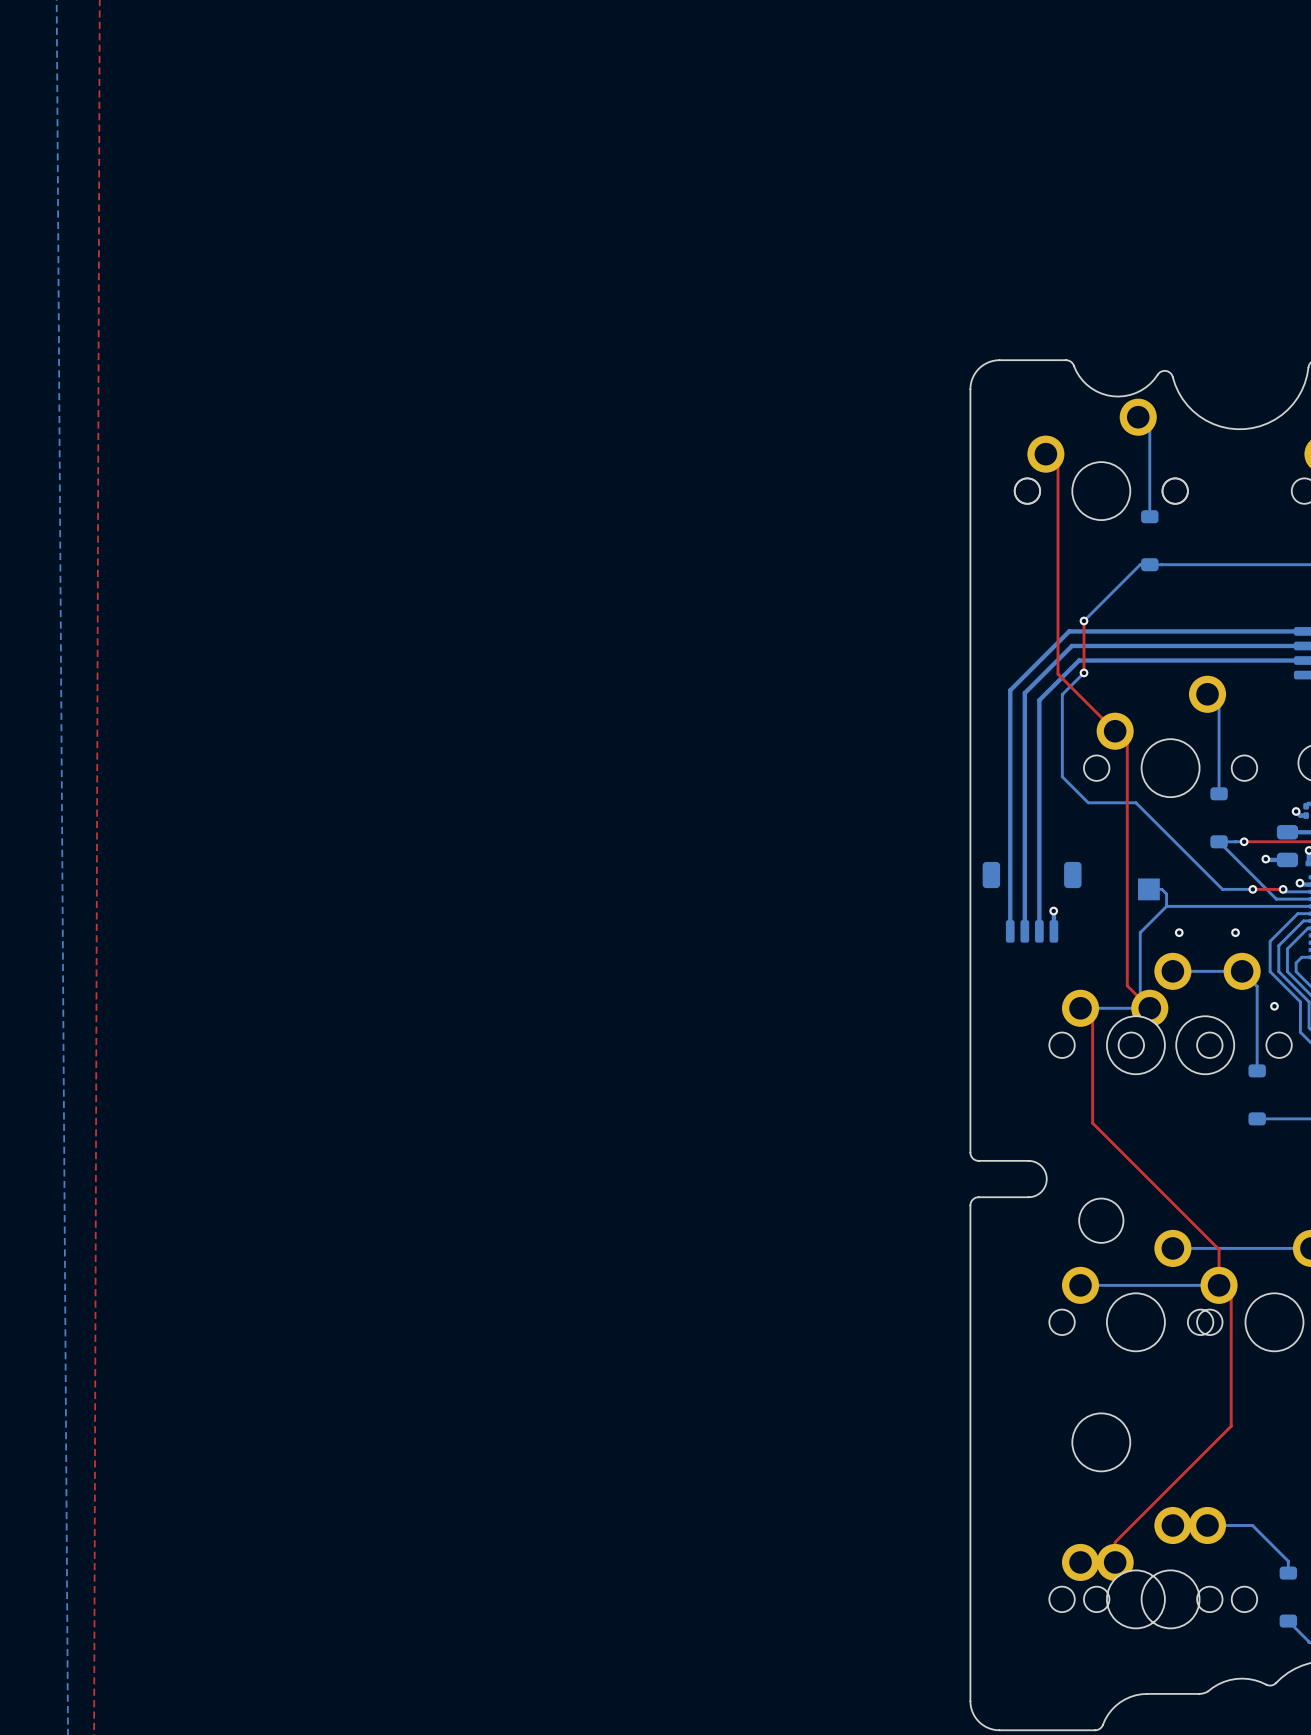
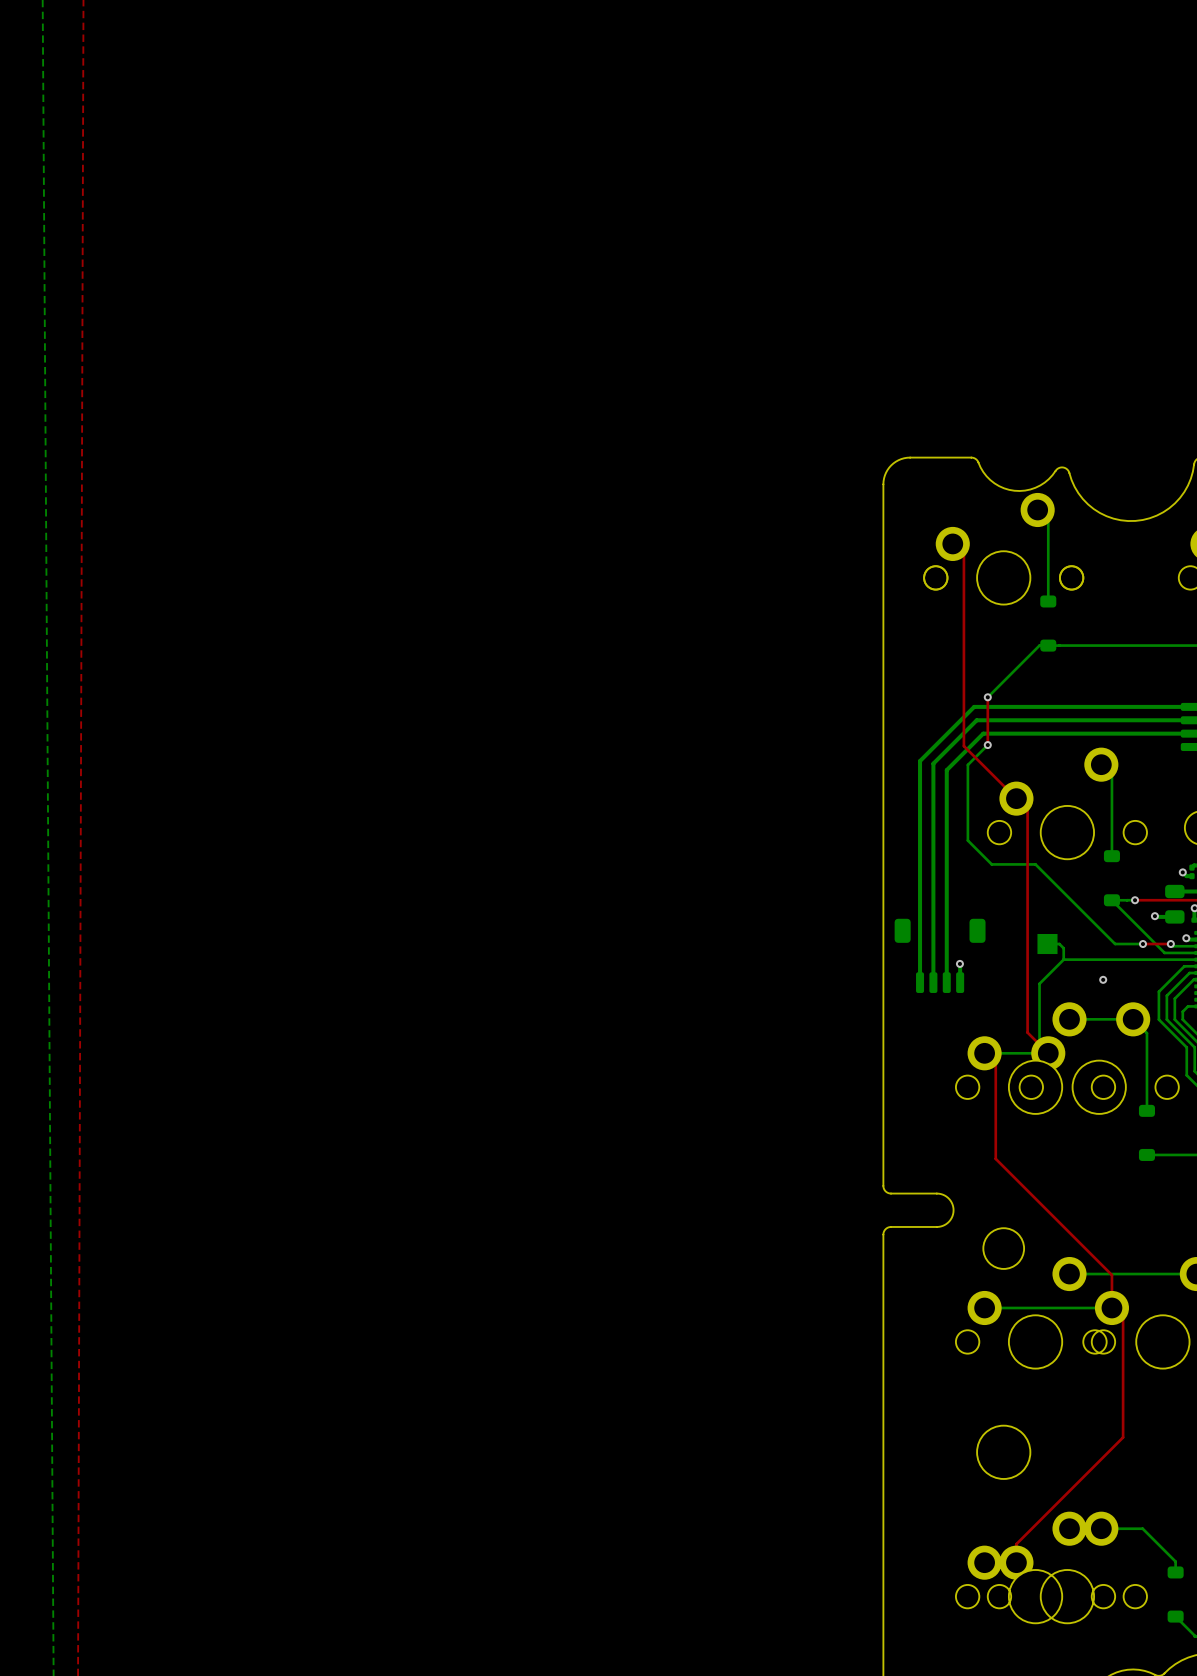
via: none -> (1103, 979)
via: (1179, 932) -> none
via: (1235, 932) -> none
via: (1274, 1006) -> none

